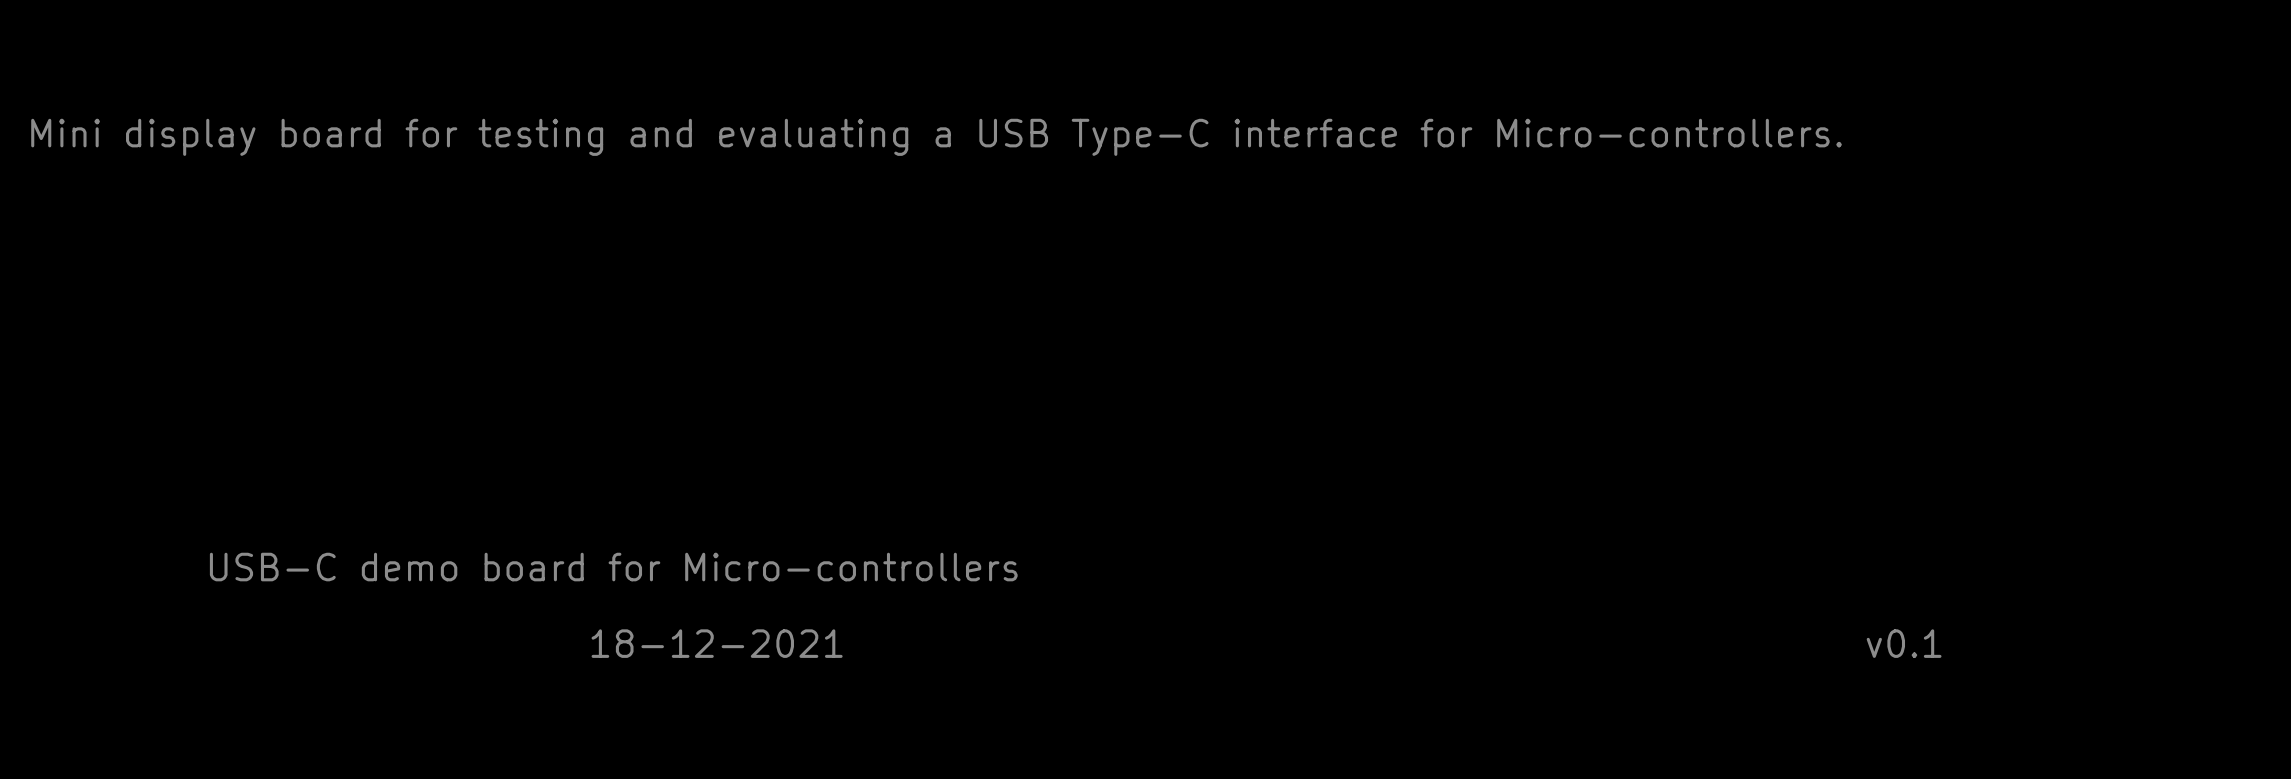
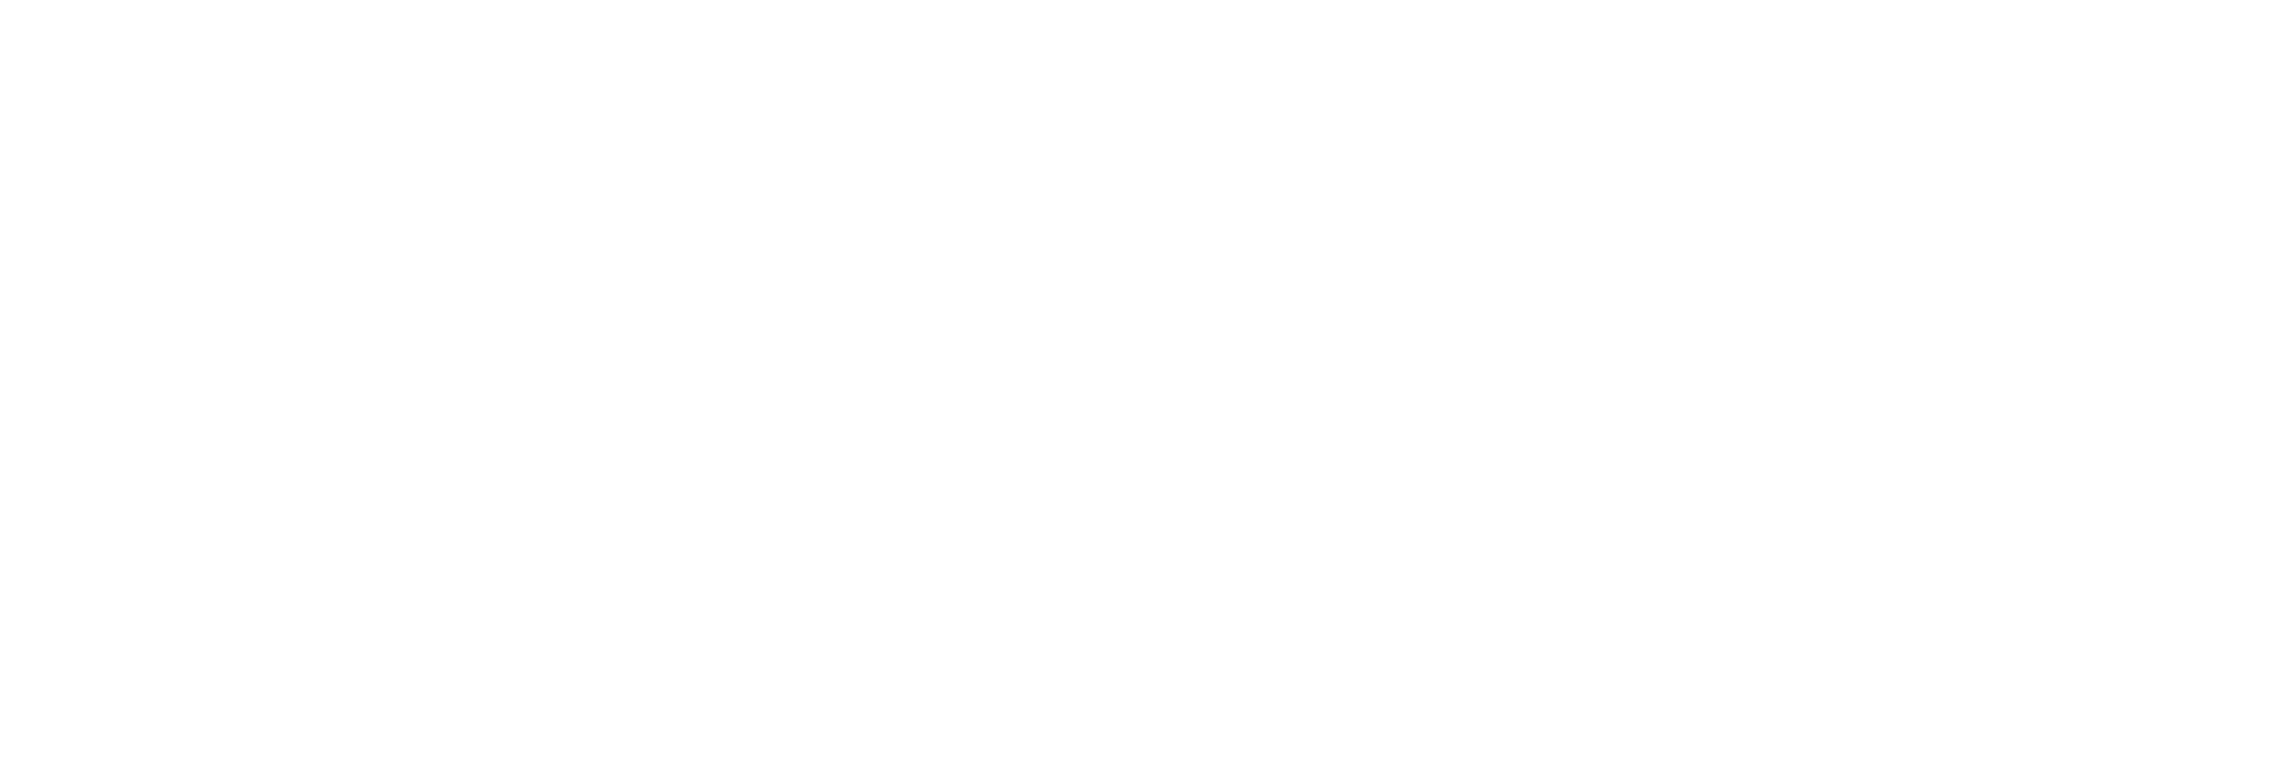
text: Mini display board for testing and evaluating a USB Type-C interface for Micro-controllers. (936, 137) -> none
text: USB-C demo board for Micro-controllers (613, 567) -> none
text: 18-12-2021 (717, 643) -> none
text: v0.1 (1904, 643) -> none

